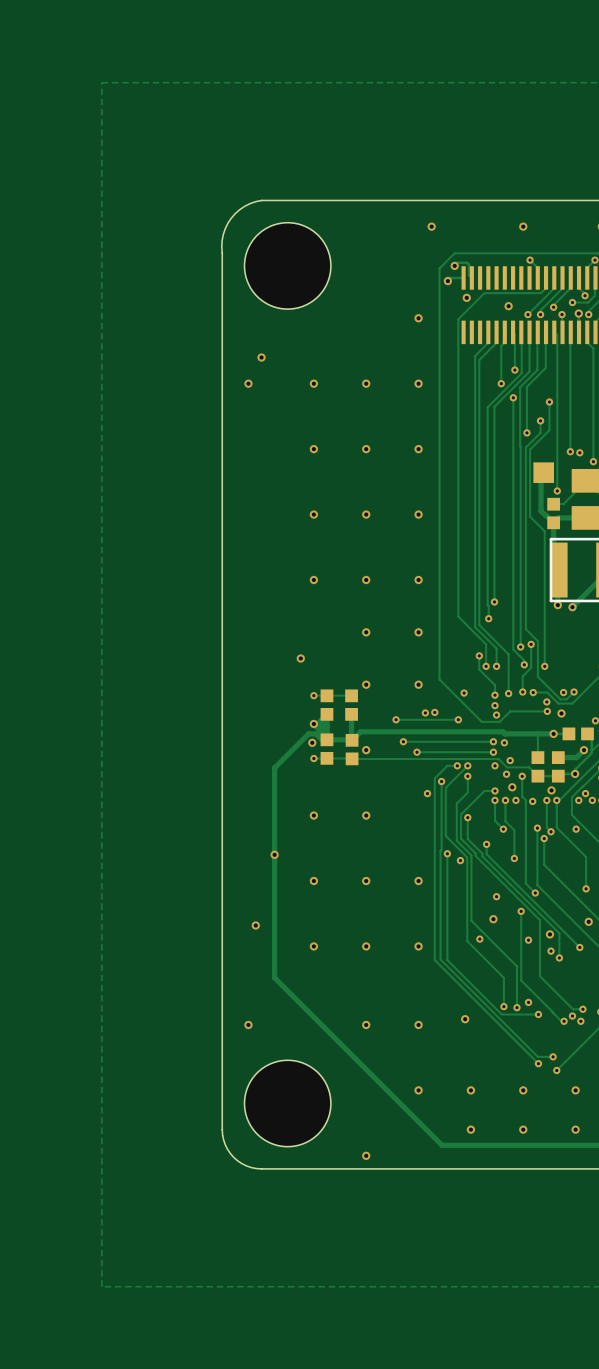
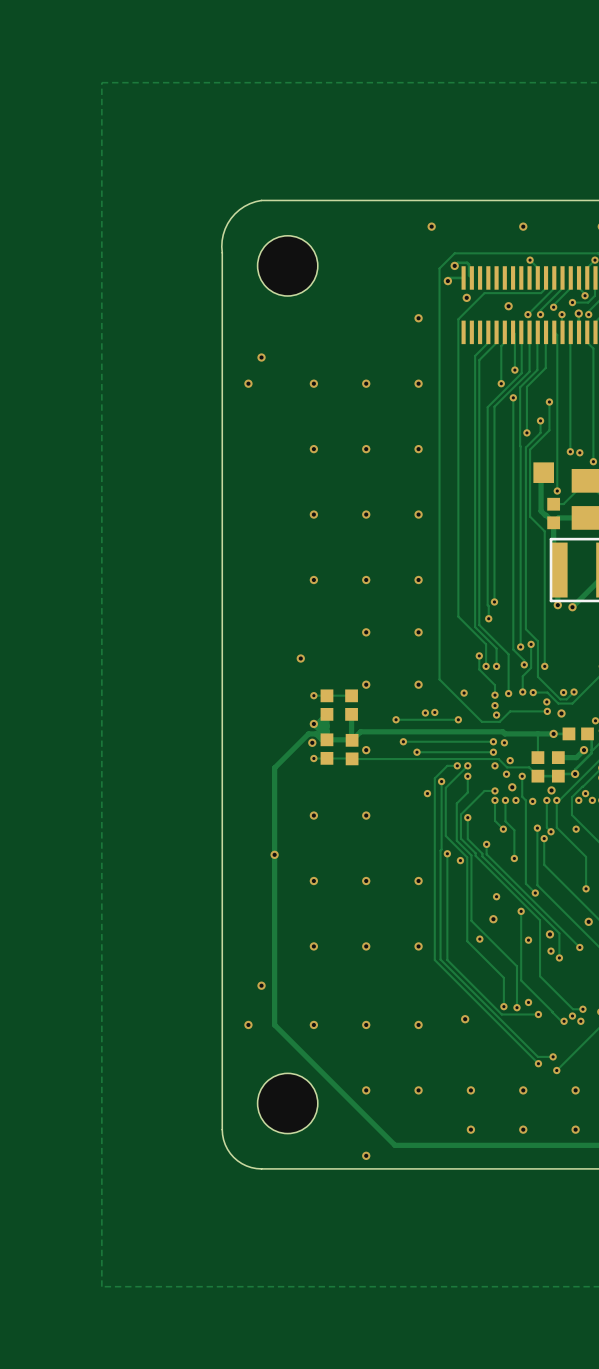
hole size: [244, 222, 331, 310] -> [257, 235, 318, 297]
via: (255, 925) -> none
track: (274, 977) (442, 1145) -> (274, 977) (274, 1024) (395, 1145) (442, 1145)
via: none -> (261, 985)
via: none -> (313, 1024)
hole size: [244, 1060, 331, 1147] -> [257, 1073, 318, 1134]
via: none -> (366, 1090)

